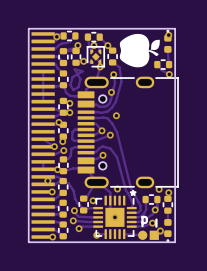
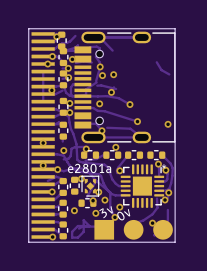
drawing: [119, 33, 160, 68] -> none
part rotation: 0° (69, 35) -> 90° clockwise (61, 40)
via: (168, 35) -> none
track: (87, 37) (91, 51) -> none
track: none -> (93, 37) (141, 37)
part: (93, 37) -> none
part: (167, 41) -> none
via: (77, 45) -> none
via: (94, 45) -> none
via: (107, 45) -> none
track: (167, 49) (168, 62) -> none
via: none -> (52, 56)
part: (76, 56) -> none
part position: (95, 56) -> (90, 186)
part: (112, 56) -> none
via: none -> (72, 59)
via: (83, 61) -> none
track: (112, 62) (119, 67) (121, 81) (115, 101) (107, 111) (85, 112) -> none
track: (47, 64) (55, 64) (63, 73) -> none
via: none -> (47, 64)
part: (163, 64) -> none
track: none -> (68, 68) (62, 68)
via: none -> (68, 68)
track: (74, 69) (80, 79) (78, 87) (73, 90) (70, 85) (72, 77) (82, 71) (74, 69) -> none
track: (113, 74) (115, 82) (109, 103) (103, 106) (85, 104) -> none
via: (169, 74) -> none
via: none -> (102, 75)
track: none -> (68, 77) (62, 78)
via: none -> (68, 77)
track: none -> (82, 84) (73, 84) (70, 87) (72, 96) (106, 96) (118, 98) (129, 104)
track: none -> (97, 85) (116, 89)
via: none -> (51, 90)
track: none -> (62, 90) (55, 94) (43, 94)
via: none -> (99, 103)
via: none -> (129, 104)
track: none -> (82, 107) (93, 108) (137, 121)
track: none -> (61, 112) (68, 116) (76, 144) (77, 159) (83, 162) (104, 164) (108, 167) (115, 183) (118, 186) (125, 186)
via: (116, 115) -> none
track: (85, 117) (107, 118) (117, 132) (130, 187) (140, 205) (140, 210) (138, 212) (131, 212) -> none
via: none -> (137, 121)
via: (58, 122) -> none
via: none -> (168, 124)
track: none -> (107, 127) (130, 128) (141, 137) (93, 137)
track: (85, 129) (74, 129) (72, 131) (72, 138) (73, 140) (94, 141) (110, 135) -> none
part position: (128, 132) -> (125, 87)
via: (110, 135) -> none
track: (43, 139) (54, 146) -> none
via: (62, 141) -> none
via: none -> (43, 143)
via: (54, 146) -> none
via: none -> (115, 147)
via: none -> (86, 149)
track: (63, 150) (55, 154) -> (125, 195) (111, 193) (98, 174) (76, 170) (69, 165) (63, 155) (55, 154)
track: (85, 152) (96, 151) (102, 146) (110, 148) (117, 157) (125, 190) (133, 204) (131, 208) -> none
part: none -> (90, 155)
via: (103, 155) -> none
part: none -> (112, 155)
track: none -> (128, 155) (118, 167) (117, 173)
part: none -> (134, 155)
part: none -> (156, 155)
track: none -> (162, 155) (170, 163) (172, 175) (171, 183) (168, 190) (169, 188) (165, 190) (159, 190)
via: none -> (158, 164)
via: none -> (43, 165)
part: (63, 165) -> none
track: none -> (158, 165) (159, 176)
text: none -> e2801a (89, 168)
via: none -> (119, 170)
track: none -> (165, 170) (167, 179) (164, 181) (159, 181)
via: none -> (165, 170)
via: none -> (81, 178)
via: (47, 180) -> none
track: (63, 181) (68, 183) (77, 203) (83, 209) (98, 208) -> none
part: none -> (74, 185)
via: (117, 189) -> none
via: (159, 189) -> none
via: none -> (98, 192)
text position: * (133, 192) -> * (163, 166)
track: (145, 198) (146, 209) (144, 213) (139, 217) (131, 217) -> none
part: (151, 199) -> none
via: none -> (104, 200)
via: none -> (164, 200)
part rotation: 0° (83, 204) -> 90° clockwise (87, 203)
part: (167, 204) -> none
via: none -> (119, 207)
via: (155, 209) -> none
track: (74, 210) (78, 216) (98, 217) -> none
text: none -> 3v (106, 212)
via: none -> (95, 213)
text: none -> 0v (123, 214)
part position: (114, 217) -> (142, 186)
track: (73, 220) (98, 221) -> none
via: (73, 220) -> none
track: none -> (83, 220) (83, 231) (77, 237) (72, 237) (72, 231) (77, 226) (89, 226) (83, 220)
text: p (144, 221) -> none
track: (152, 223) (144, 226) (131, 226) -> none
text: - (156, 223) -> none
via: (79, 228) -> none
part: none -> (133, 229)
via: (160, 230) -> none
part: (167, 230) -> none
track: (124, 234) (142, 235) -> none
via: (96, 235) -> none
part: (148, 235) -> none

